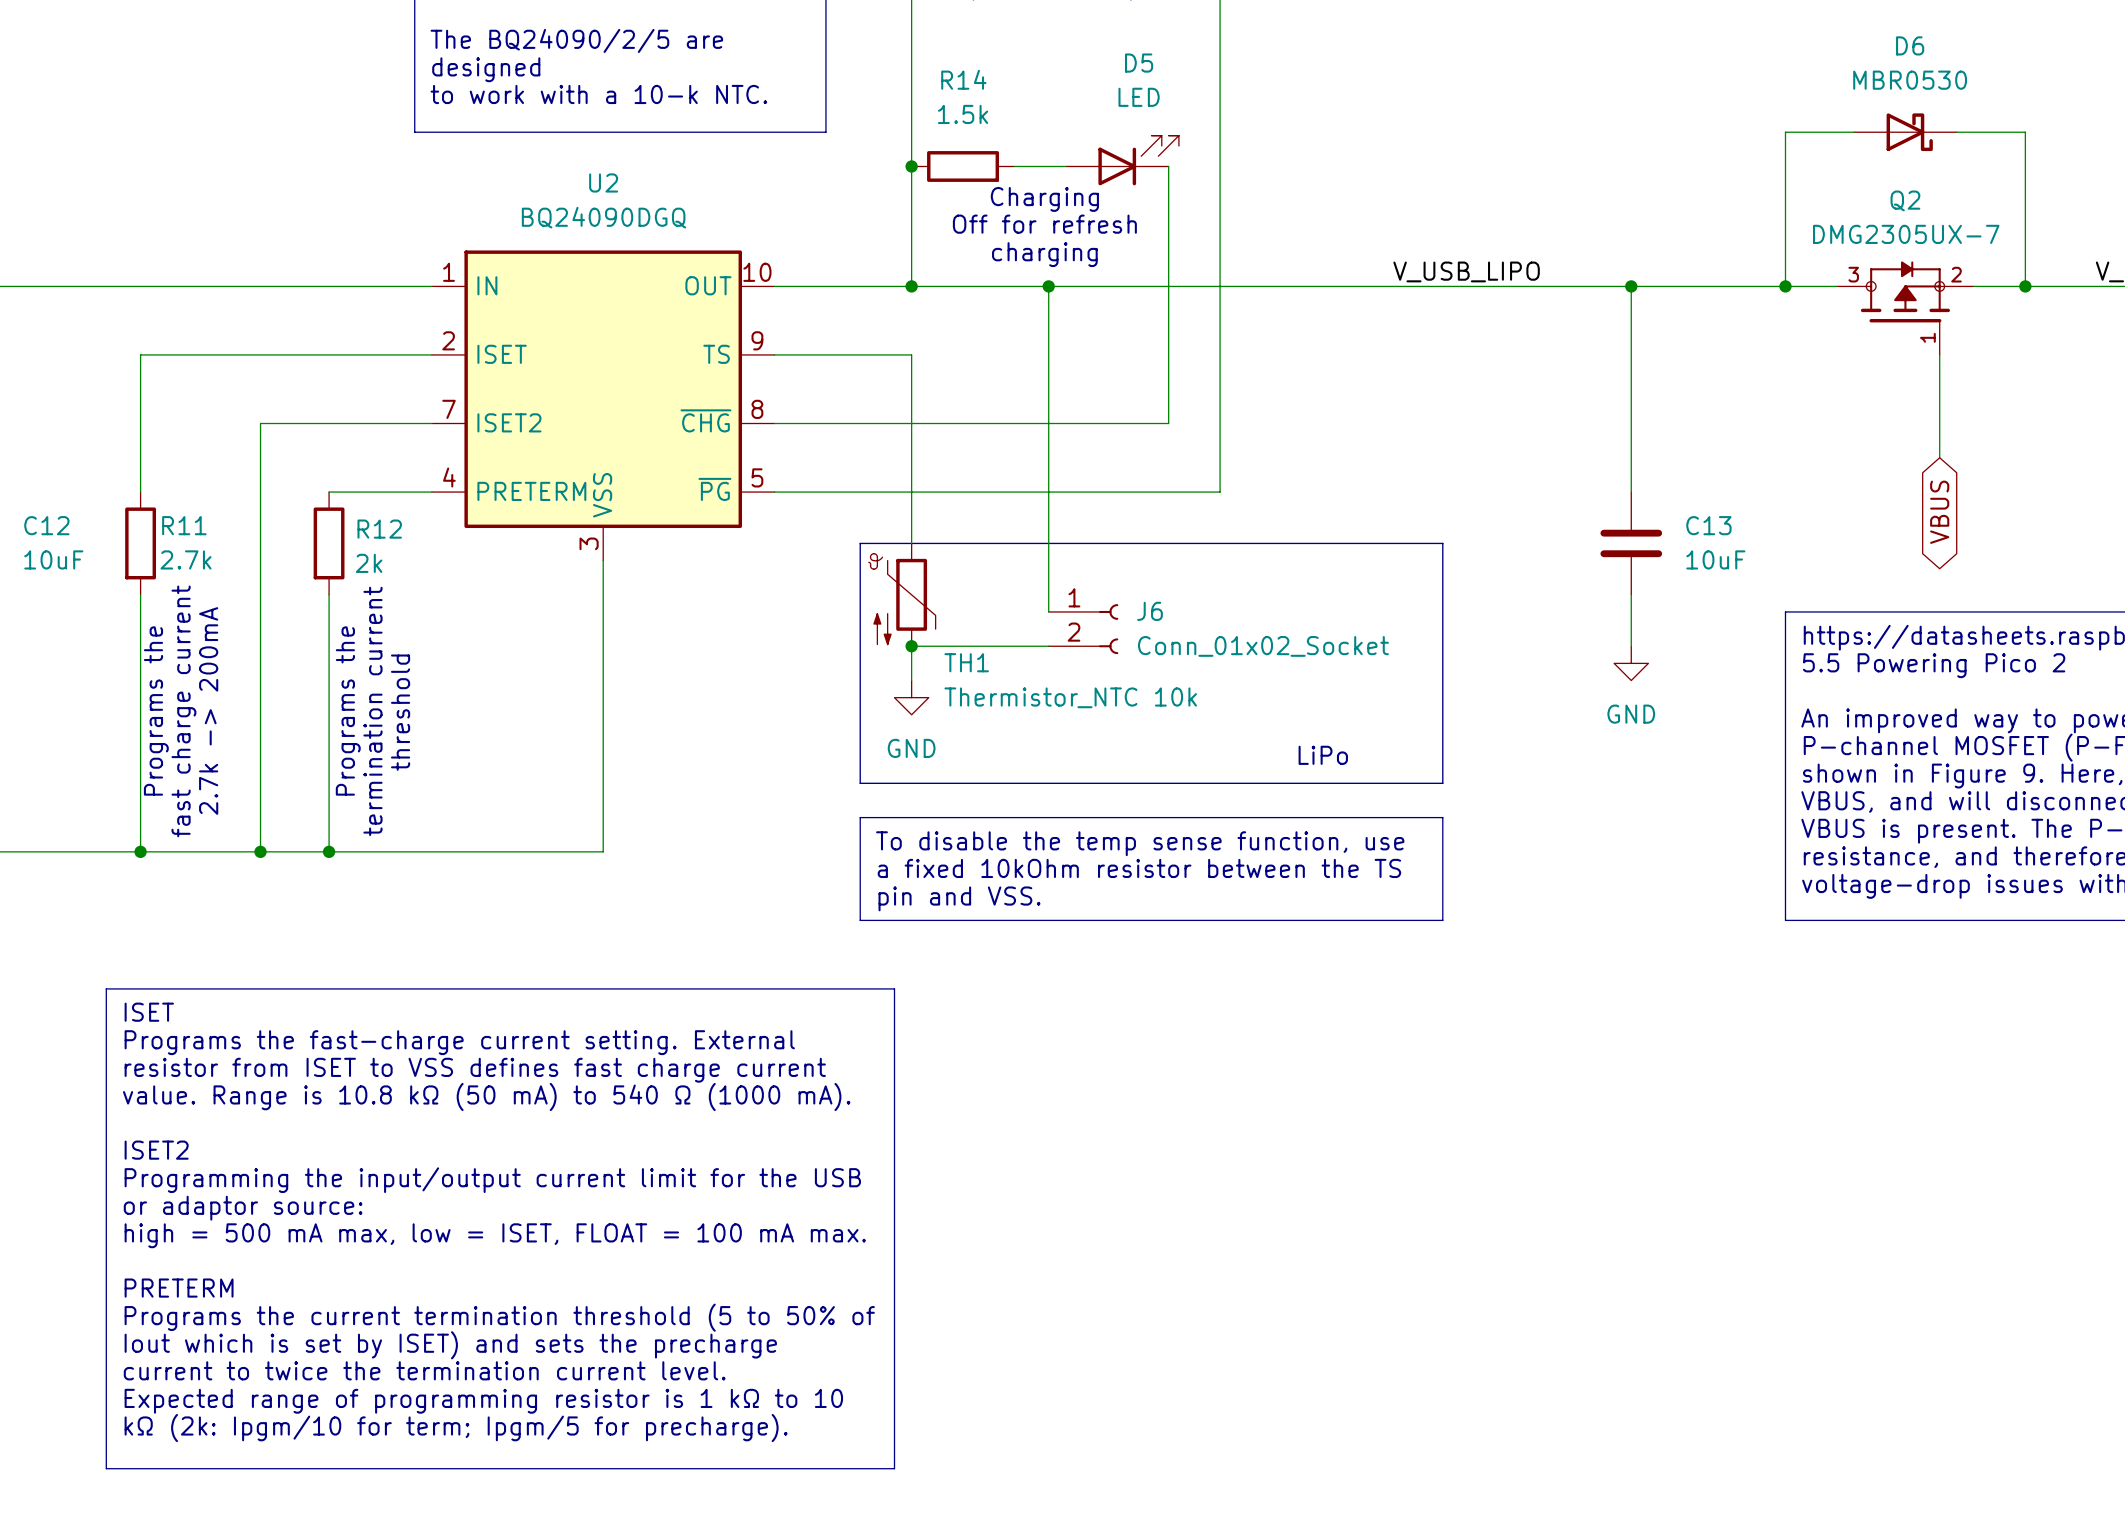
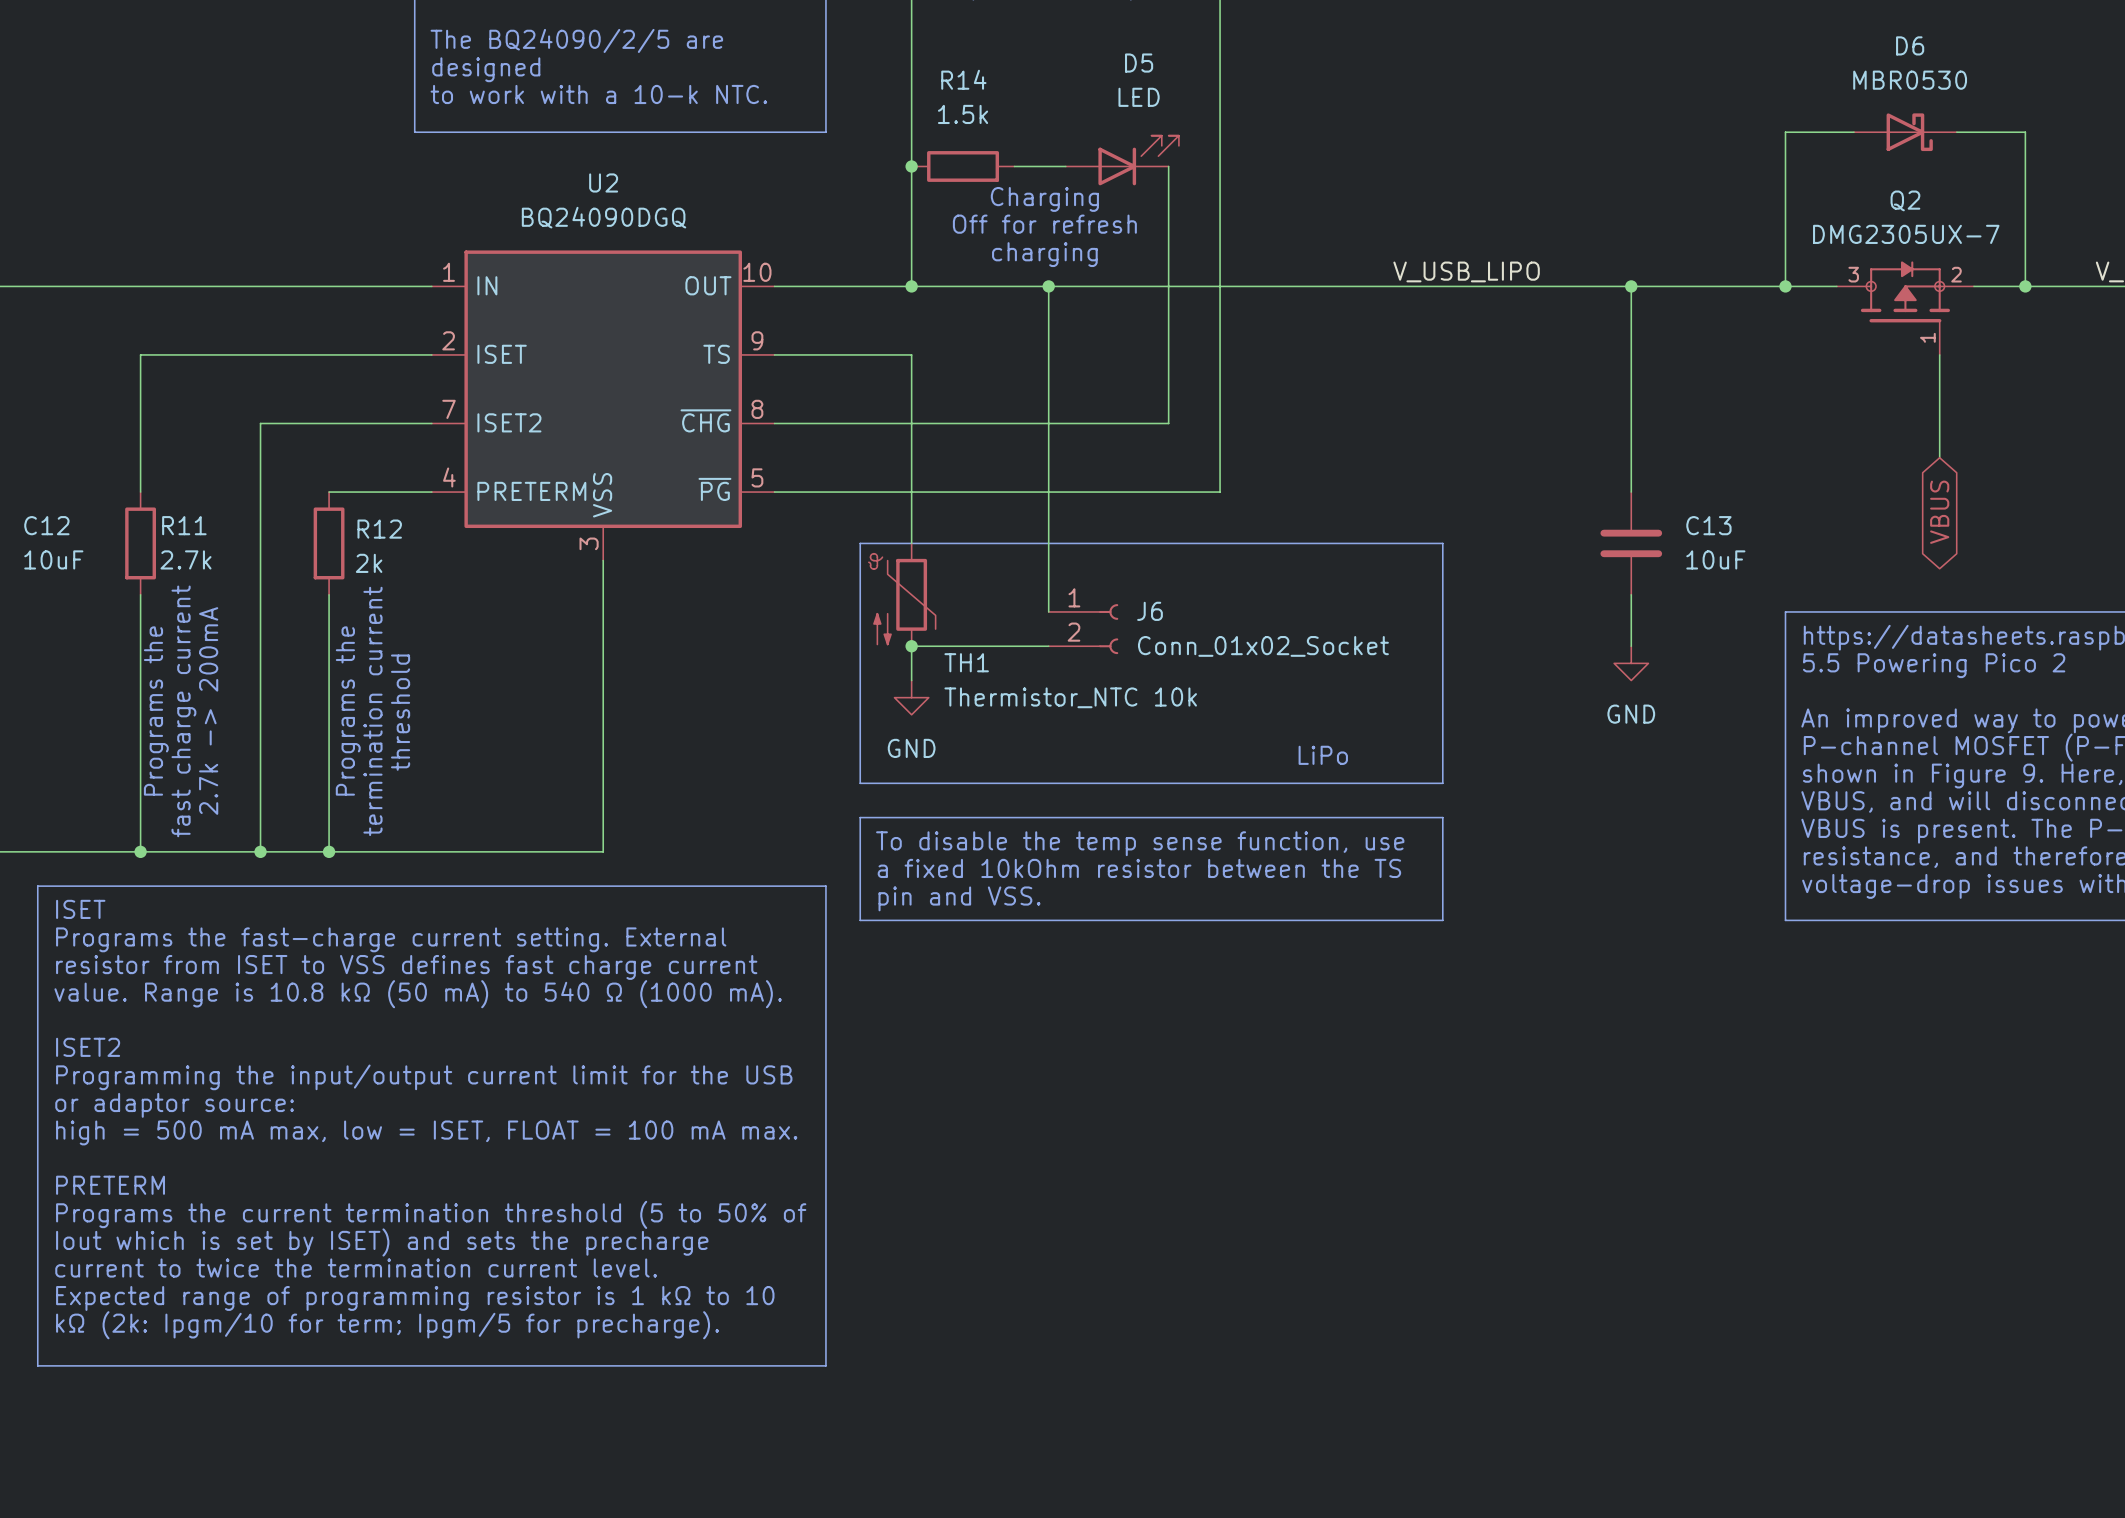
line: (106, 988) (894, 988) (894, 1468) (106, 1468) (106, 988) -> (37, 886) (825, 886) (825, 1365) (37, 1365) (37, 886)
text position: ISET (149, 1012) -> ISET (80, 909)
text position: Programs the fast-charge current setting. External (459, 1042) -> Programs the fast-charge current setting. External (391, 939)
text position: resistor from ISET to VSS defines fast charge current (475, 1070) -> resistor from ISET to VSS defines fast charge current (406, 967)
text position: value. Range is 10.8 kΩ (50 mA) to 540 Ω (1000 mA). (486, 1096) -> value. Range is 10.8 kΩ (50 mA) to 540 Ω (1000 mA). (418, 994)
text position: ISET2 (156, 1150) -> ISET2 (88, 1047)
text position: Programming the input/output current limit for the USB (492, 1180) -> Programming the input/output current limit for the USB (424, 1077)
text position: or adaptor source: (243, 1208) -> or adaptor source: (174, 1105)
text position: high = 500 mA max, low = ISET, FLOAT = 100 mA max. (495, 1235) -> high = 500 mA max, low = ISET, FLOAT = 100 mA max. (426, 1132)
text position: PRETERM (179, 1288) -> PRETERM (110, 1185)
text position: Programs the current termination threshold (5 to 50% of (499, 1317) -> Programs the current termination threshold (5 to 50% of (431, 1214)
text position: Iout which is set by ISET) and sets the precharge (450, 1345) -> Iout which is set by ISET) and sets the precharge (382, 1242)
text position: current to twice the termination current level. (424, 1370) -> current to twice the termination current level. (356, 1268)
text position: Expected range of programming resistor is 1 kΩ to 10 (483, 1401) -> Expected range of programming resistor is 1 kΩ to 10 (415, 1298)
text position: kΩ (2k: Ipgm/10 for term; Ipgm/5 for precharge). (456, 1428) -> kΩ (2k: Ipgm/10 for term; Ipgm/5 for precharge). (387, 1325)

